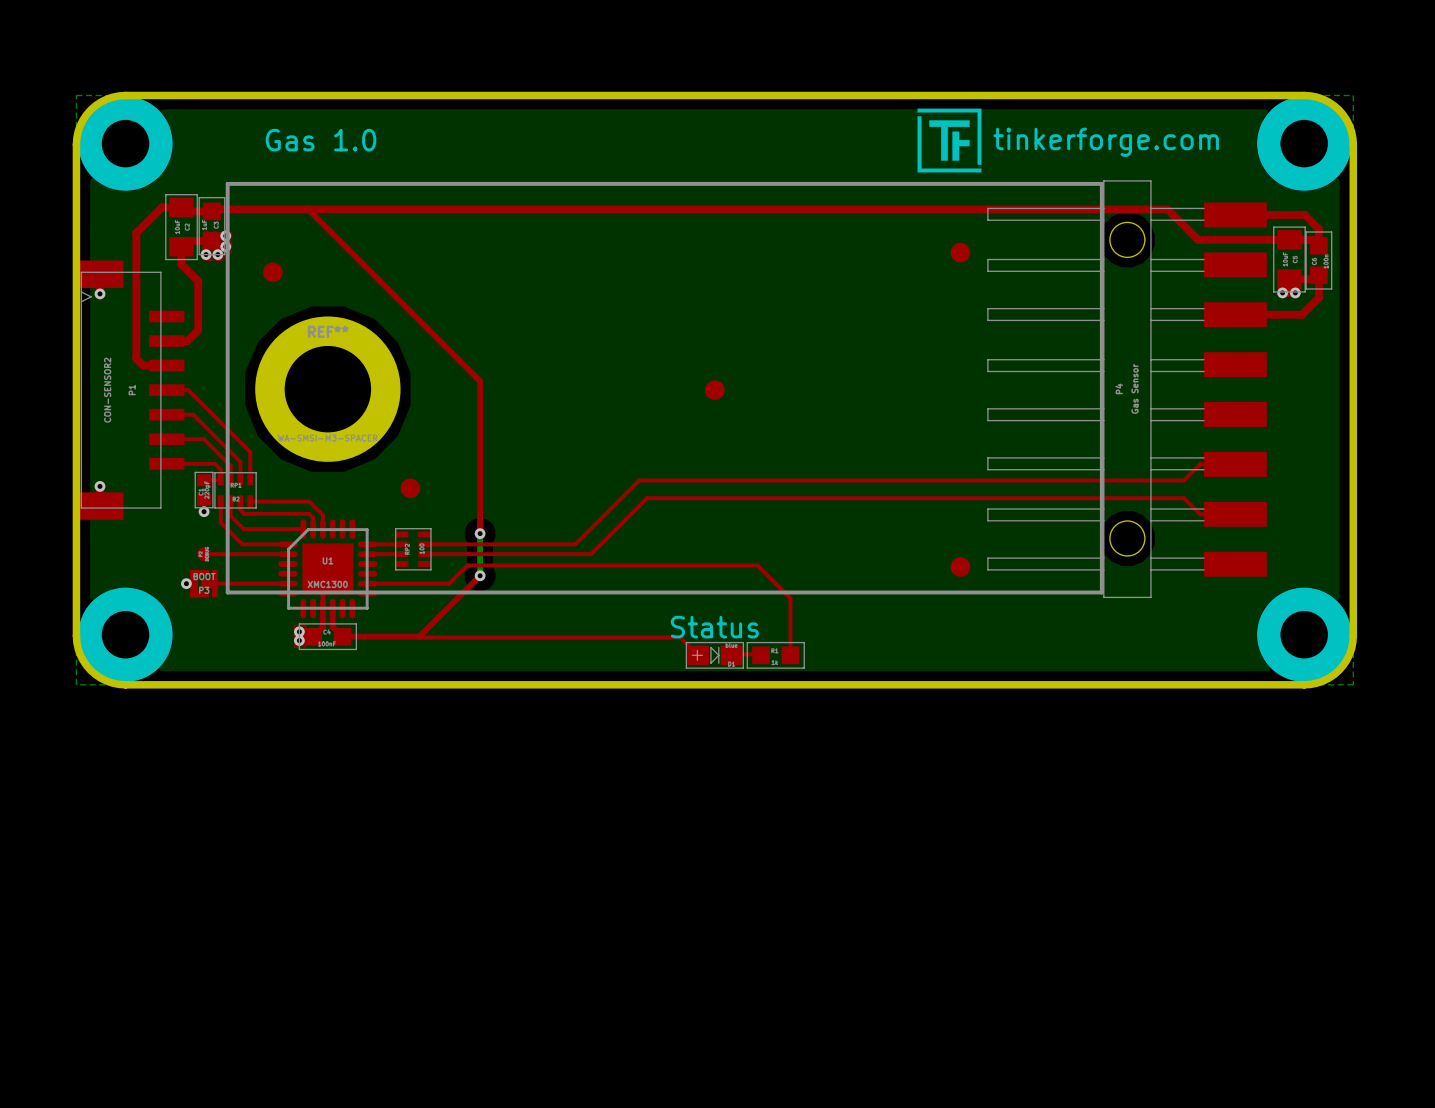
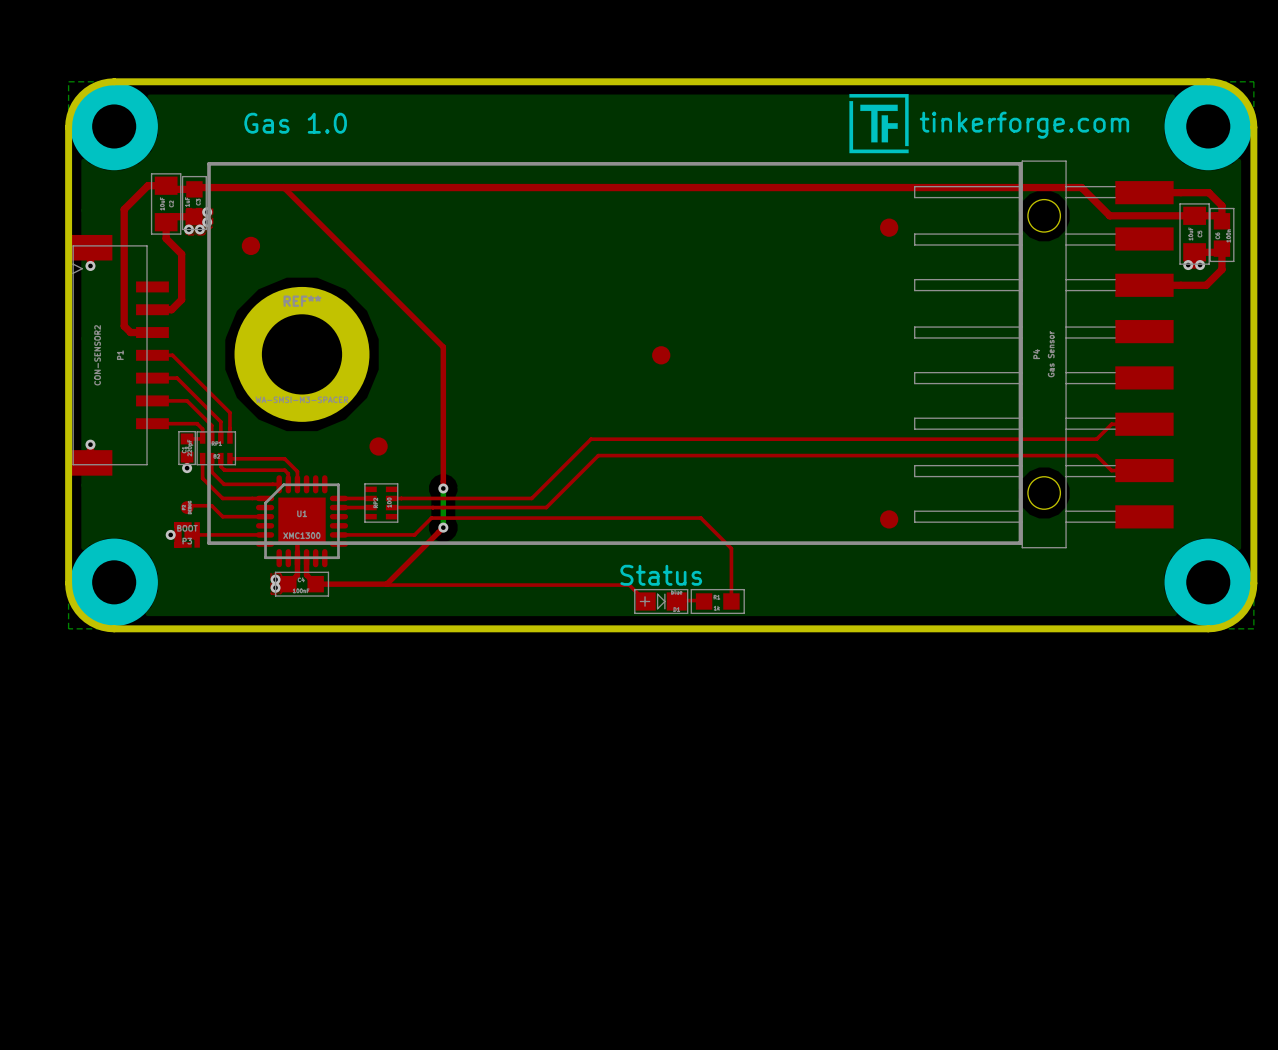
top track: none -> (187, 505) (211, 505) (222, 516) (265, 516)
top track: (203, 554) (288, 554) -> none

